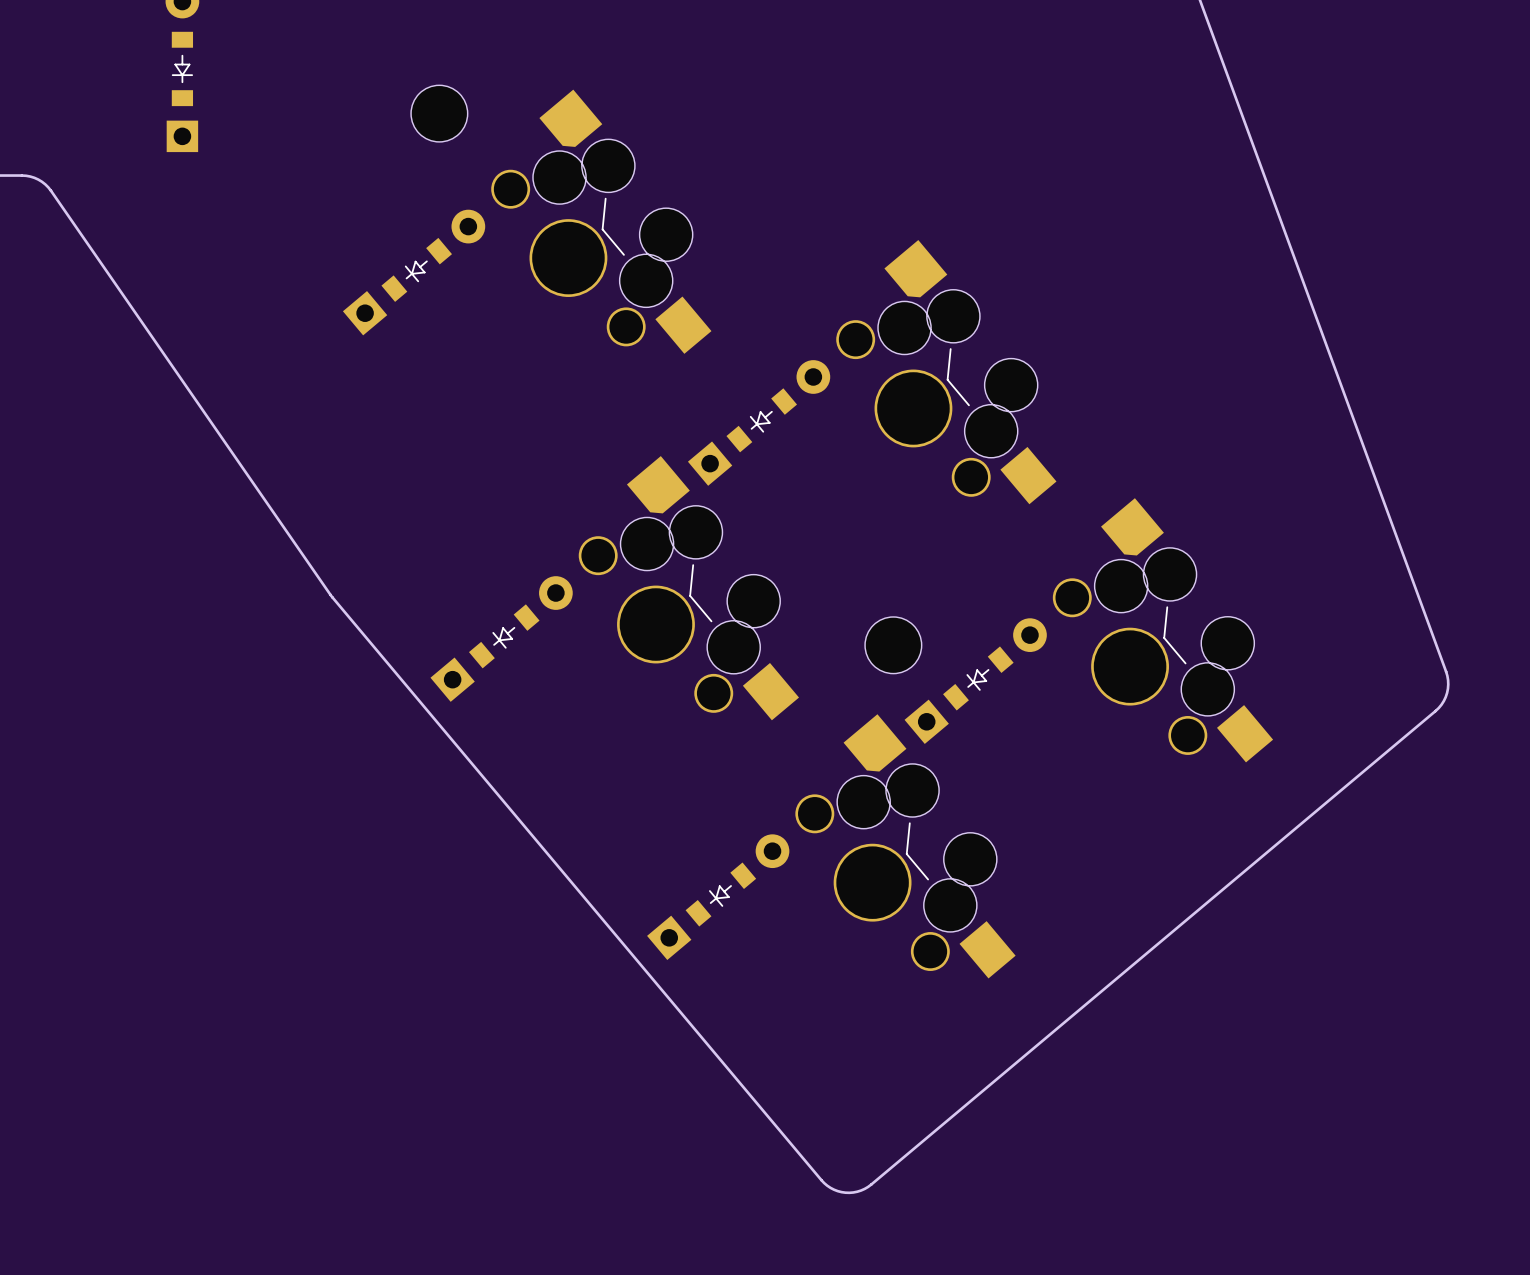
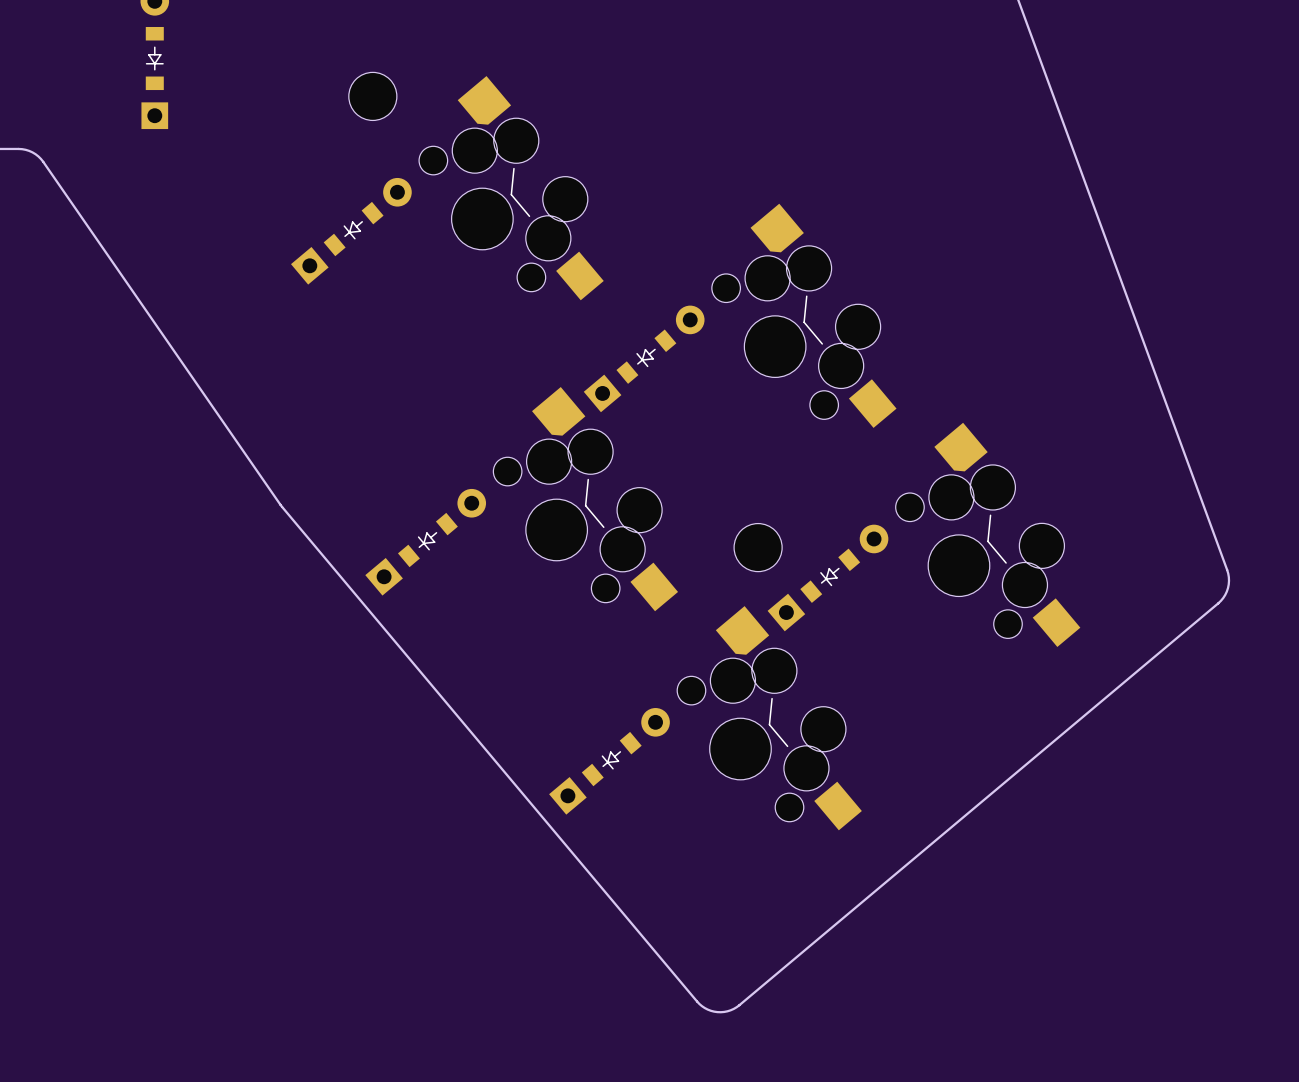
part footprint: [491, 89, 712, 354] -> [419, 76, 604, 301]
part footprint: [836, 240, 1057, 505] -> [711, 203, 897, 428]
part footprint: [578, 456, 800, 721] -> [493, 387, 679, 612]
part footprint: [1052, 498, 1274, 763] -> [895, 422, 1081, 647]
part footprint: [795, 714, 1016, 979] -> [677, 606, 862, 831]

